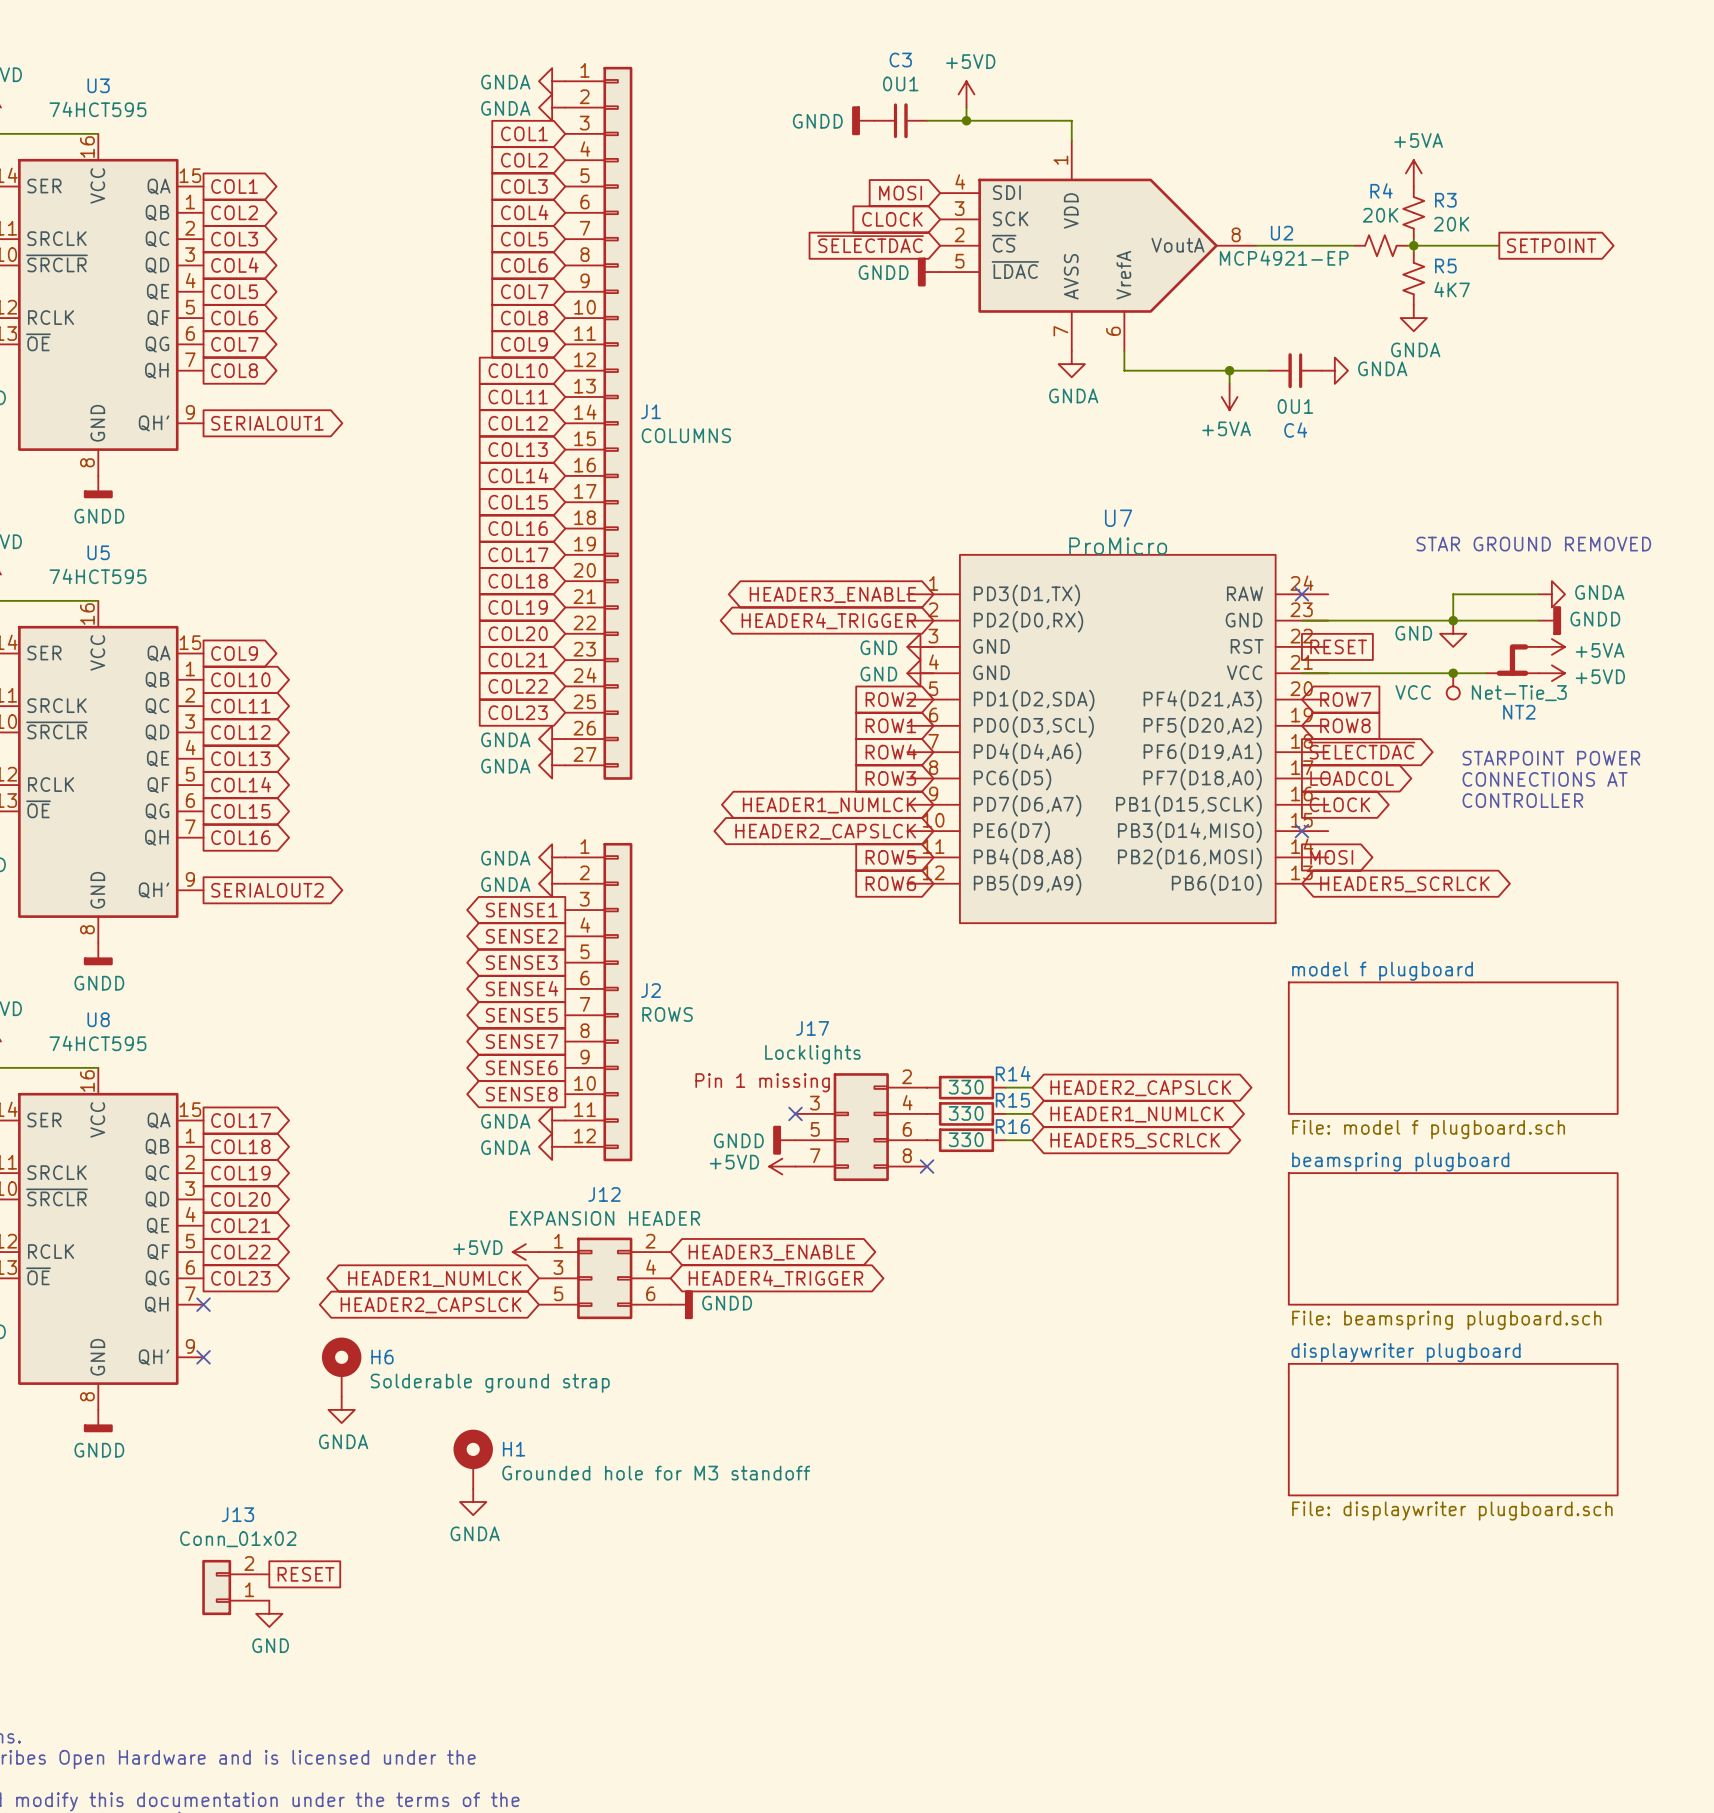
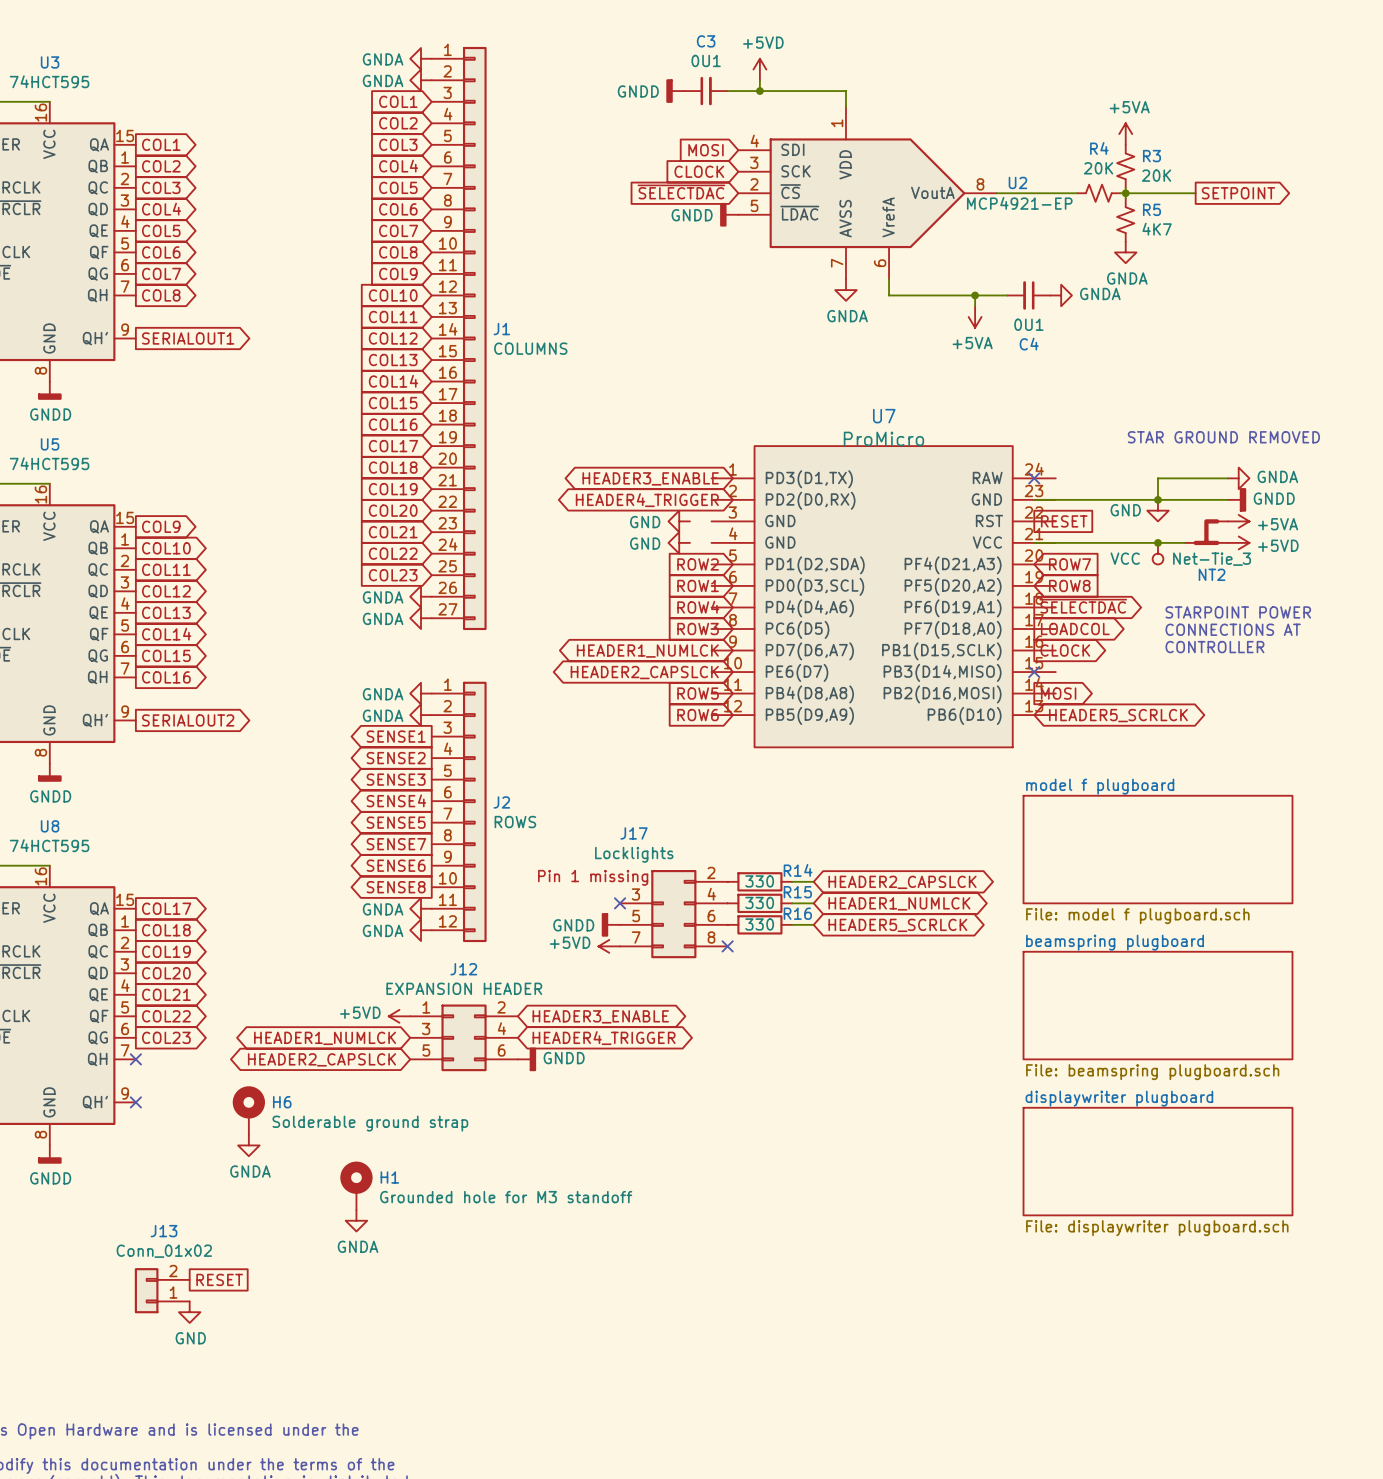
power symbol: none -> GND (679, 521)
power symbol: GND (920, 646) -> none
power symbol: none -> GND (679, 542)
power symbol: GND (920, 673) -> none

